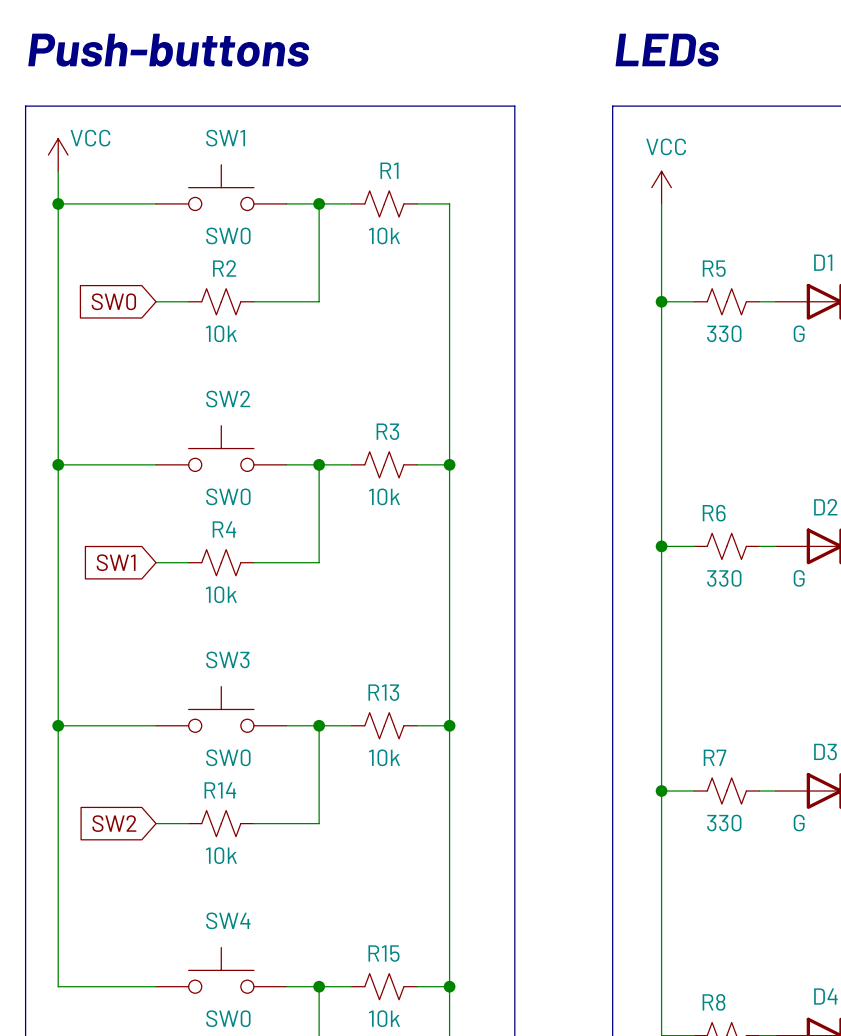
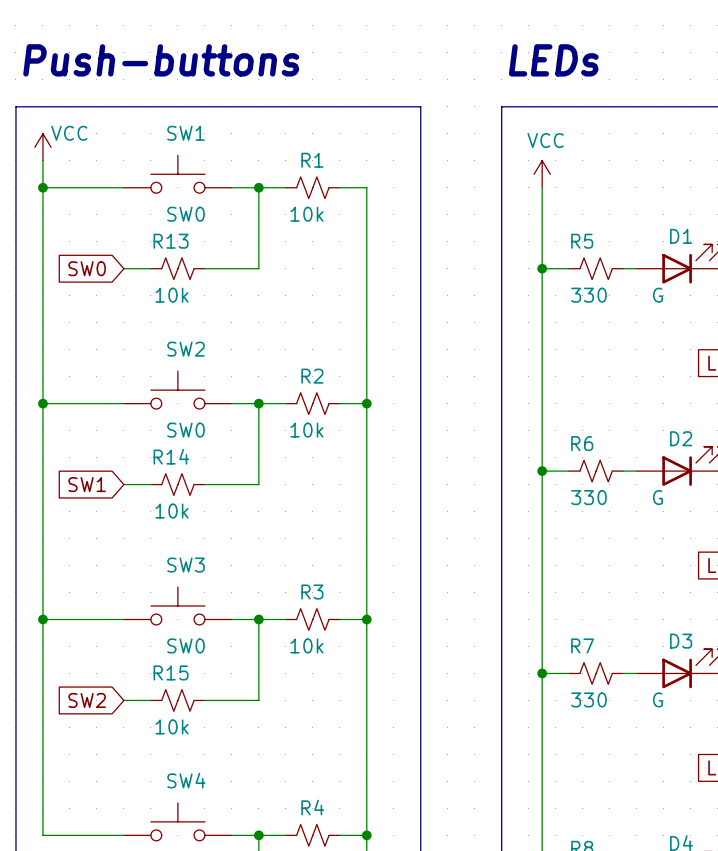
R2 name: R2 (224, 268) -> R13 (171, 241)
R3 name: R3 (387, 431) -> R2 (312, 376)
R4 name: R4 (224, 529) -> R14 (171, 456)
R13 name: R13 (383, 692) -> R3 (312, 592)
R14 name: R14 (220, 790) -> R15 (171, 672)
R15 name: R15 (383, 953) -> R4 (312, 807)

